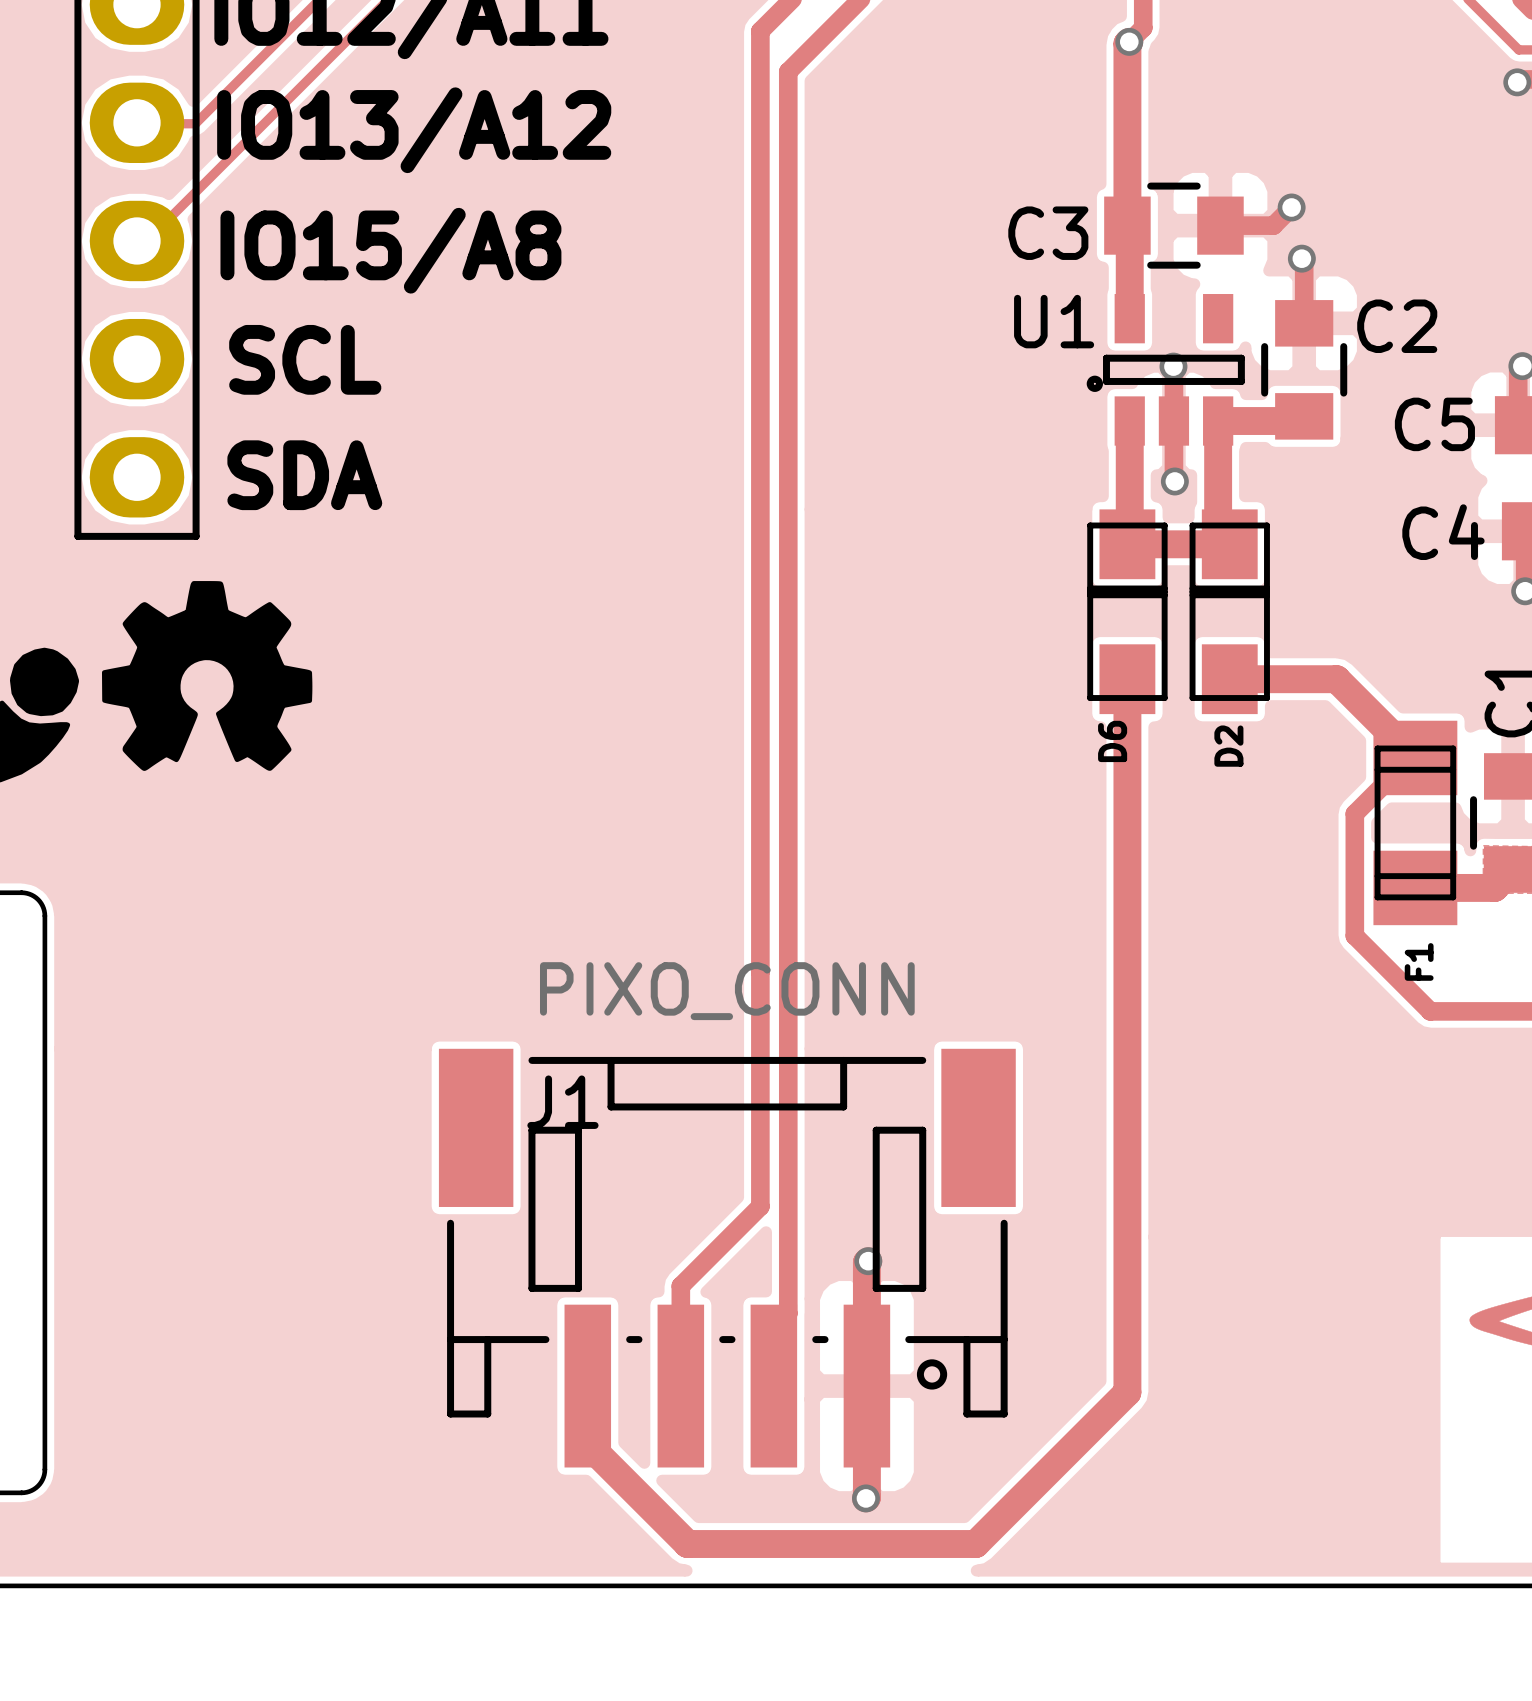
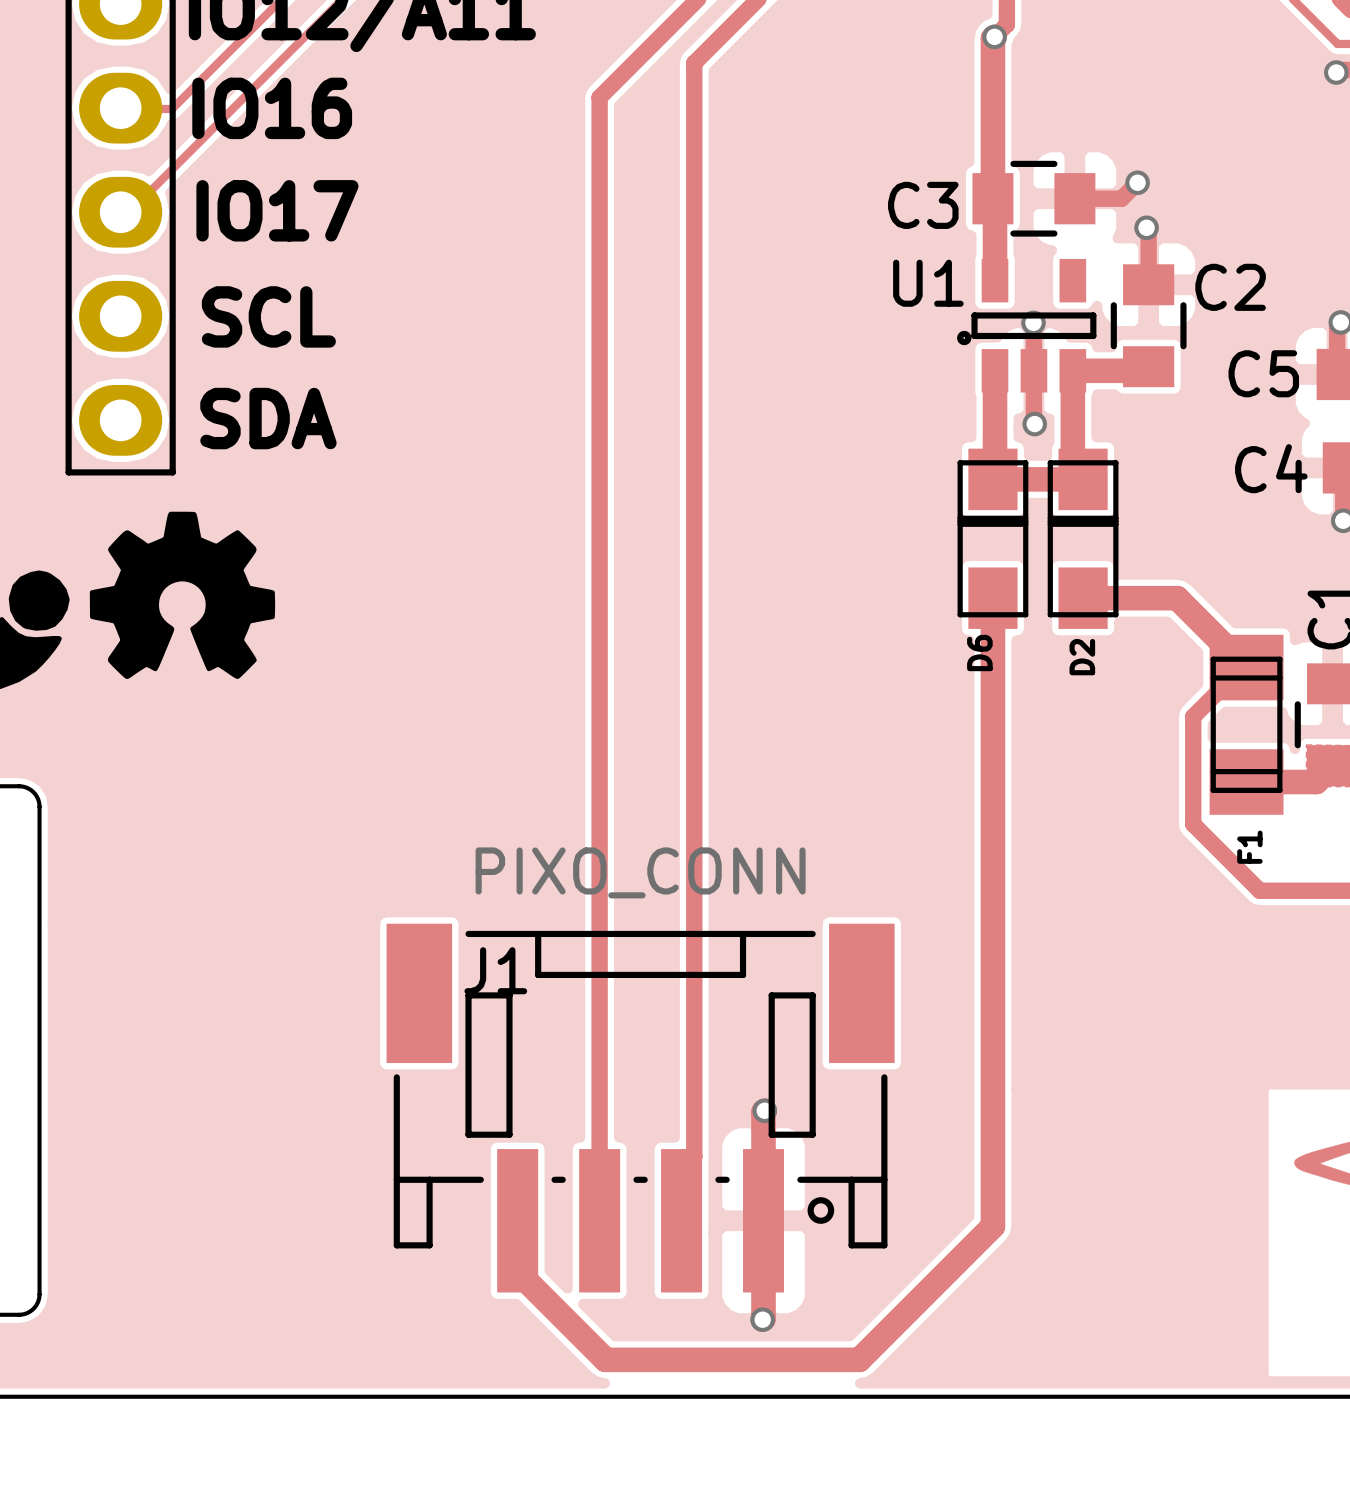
track: (760, 31) (760, 1206) (680, 1286) -> (669, 27) (599, 97) (599, 1132)
text: none -> IO16 (272, 108)
text: IO13/A12 (414, 130) -> none
text: none -> IO17 (277, 210)
text: IO15/A8 (390, 250) -> none

